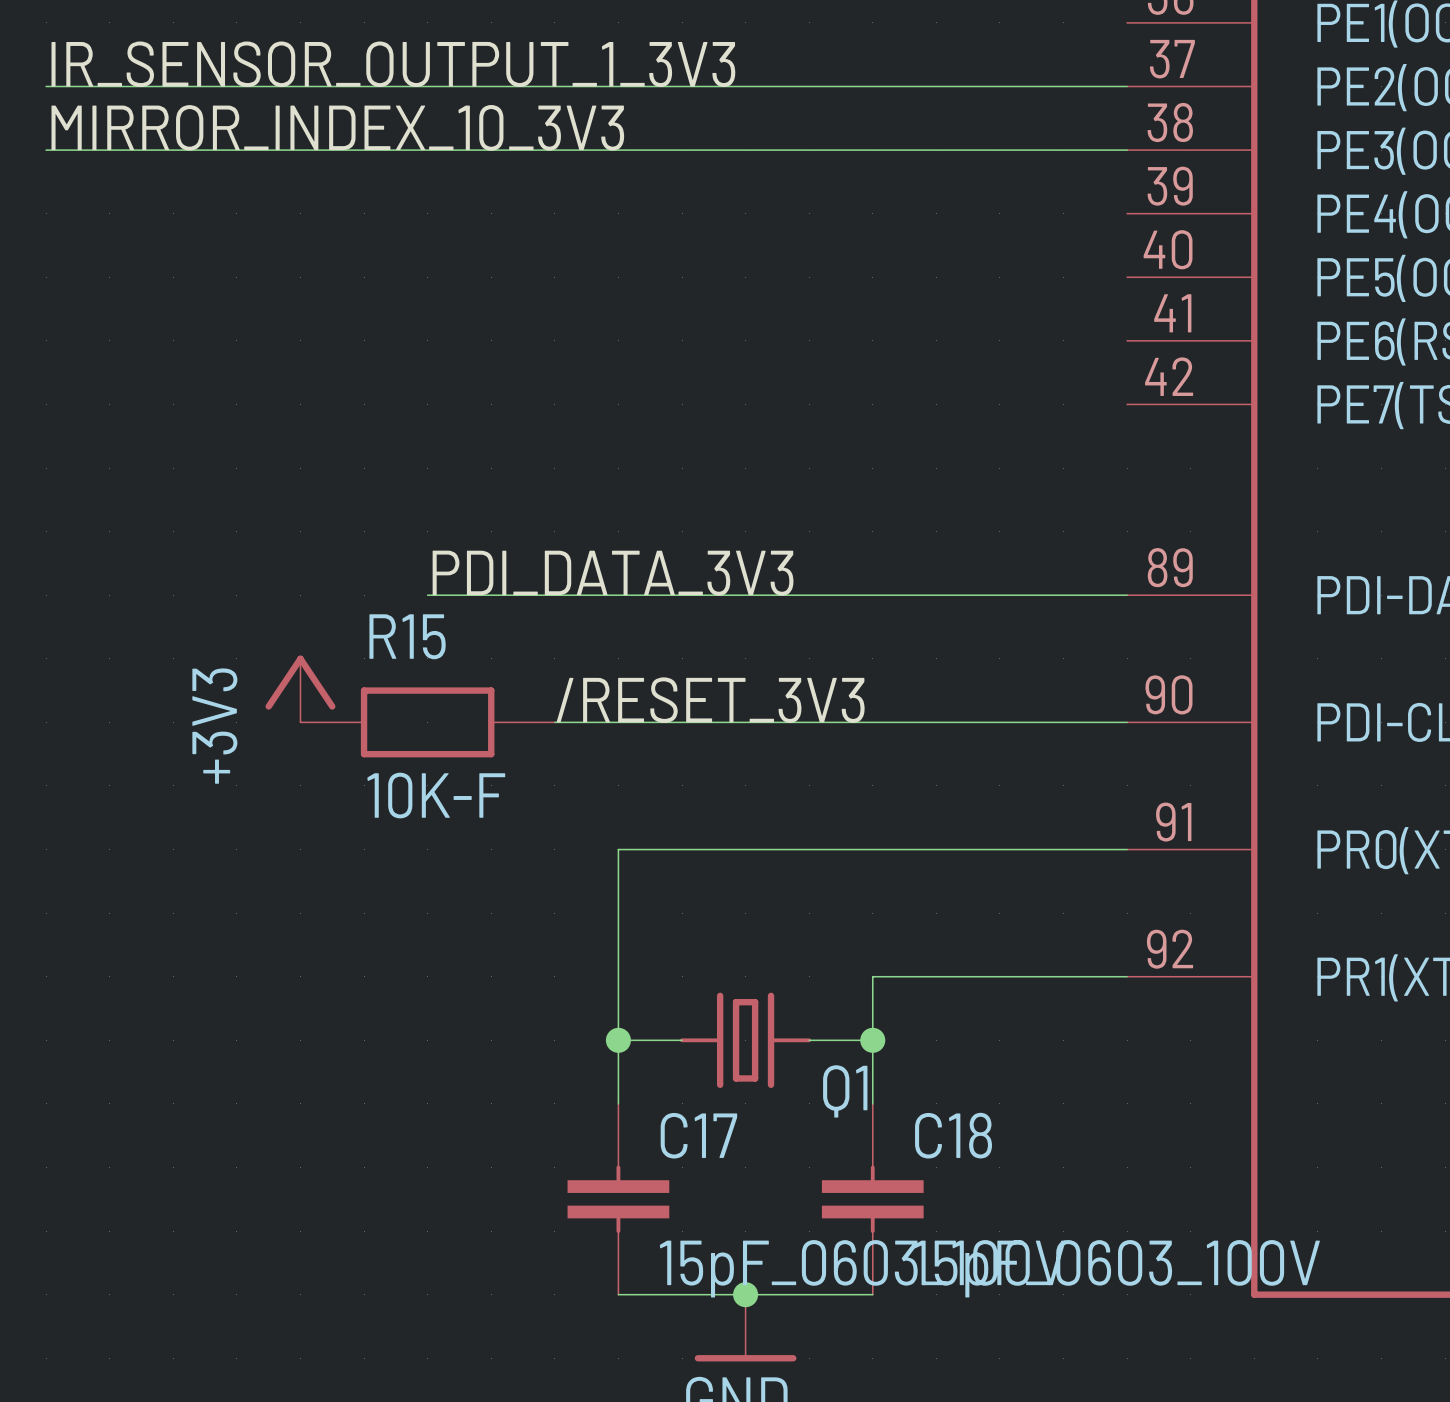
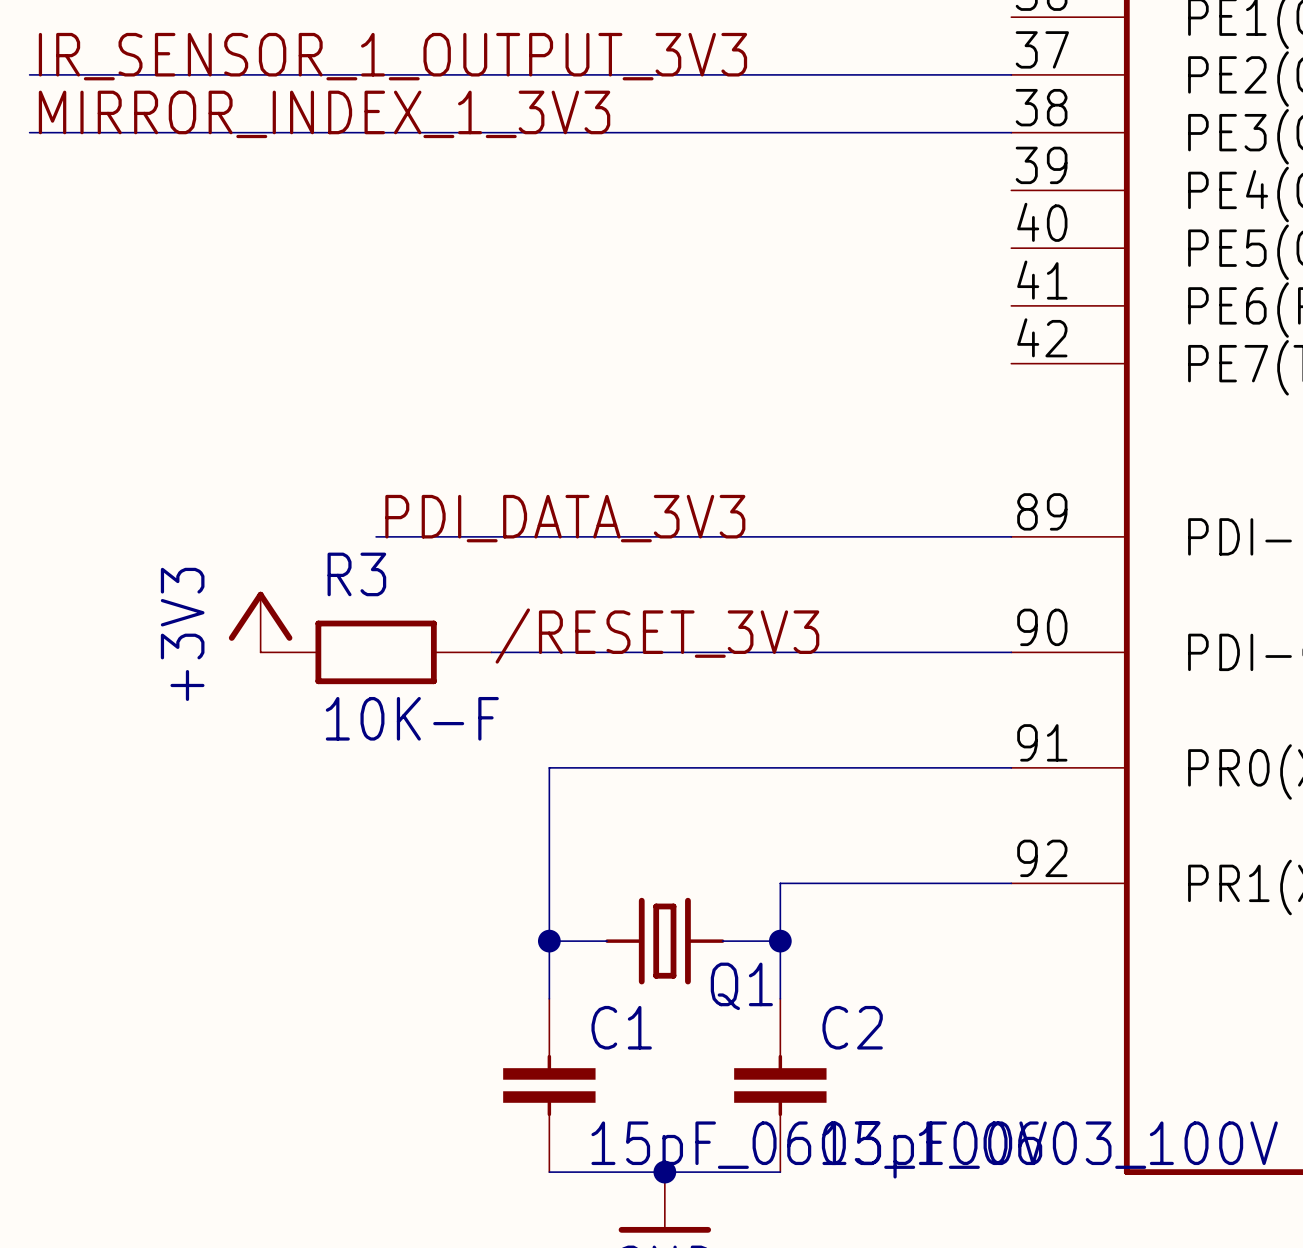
label: IR_SENSOR_OUTPUT_1_3V3 (393, 64) -> IR_SENSOR_1_OUTPUT_3V3 (392, 56)
label: MIRROR_INDEX_10_3V3 (337, 127) -> MIRROR_INDEX_1_3V3 (324, 114)
R15 name: R15 (407, 636) -> R3 (356, 574)
C17 name: C17 (698, 1135) -> C1 (621, 1027)
C18 name: C18 (953, 1135) -> C2 (852, 1027)

